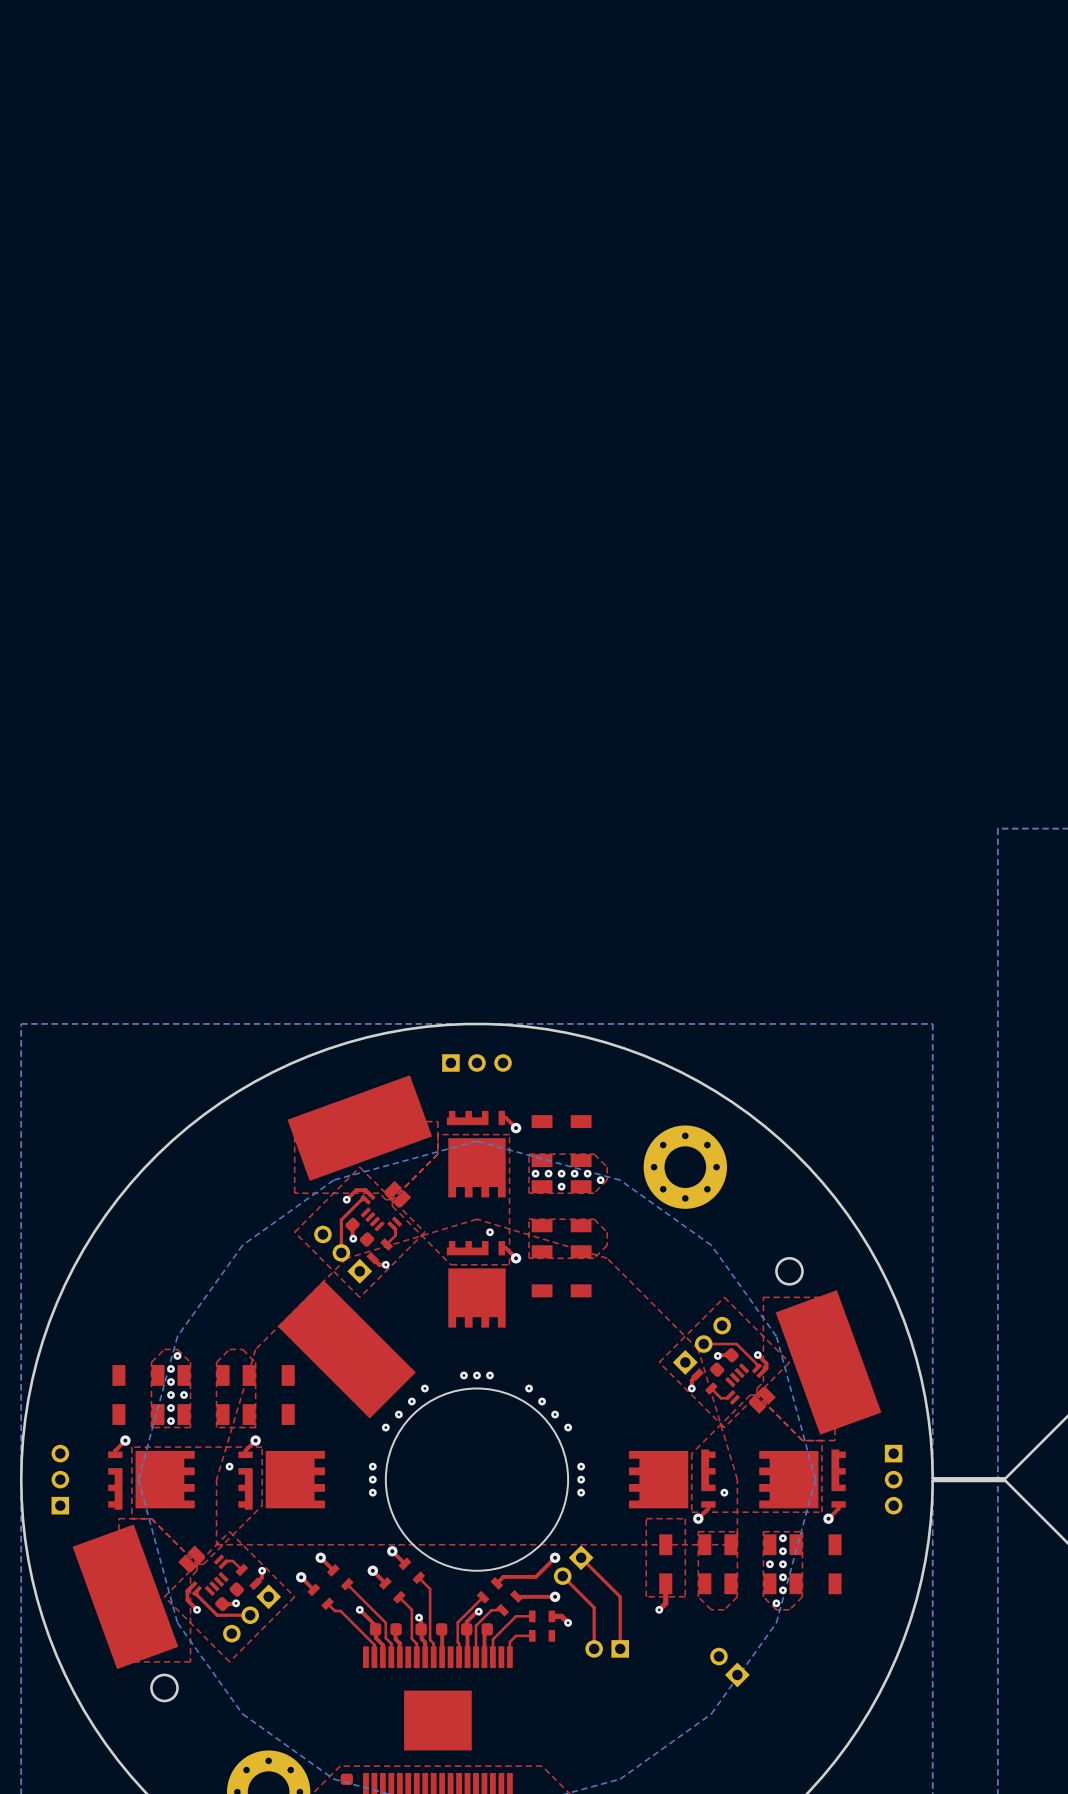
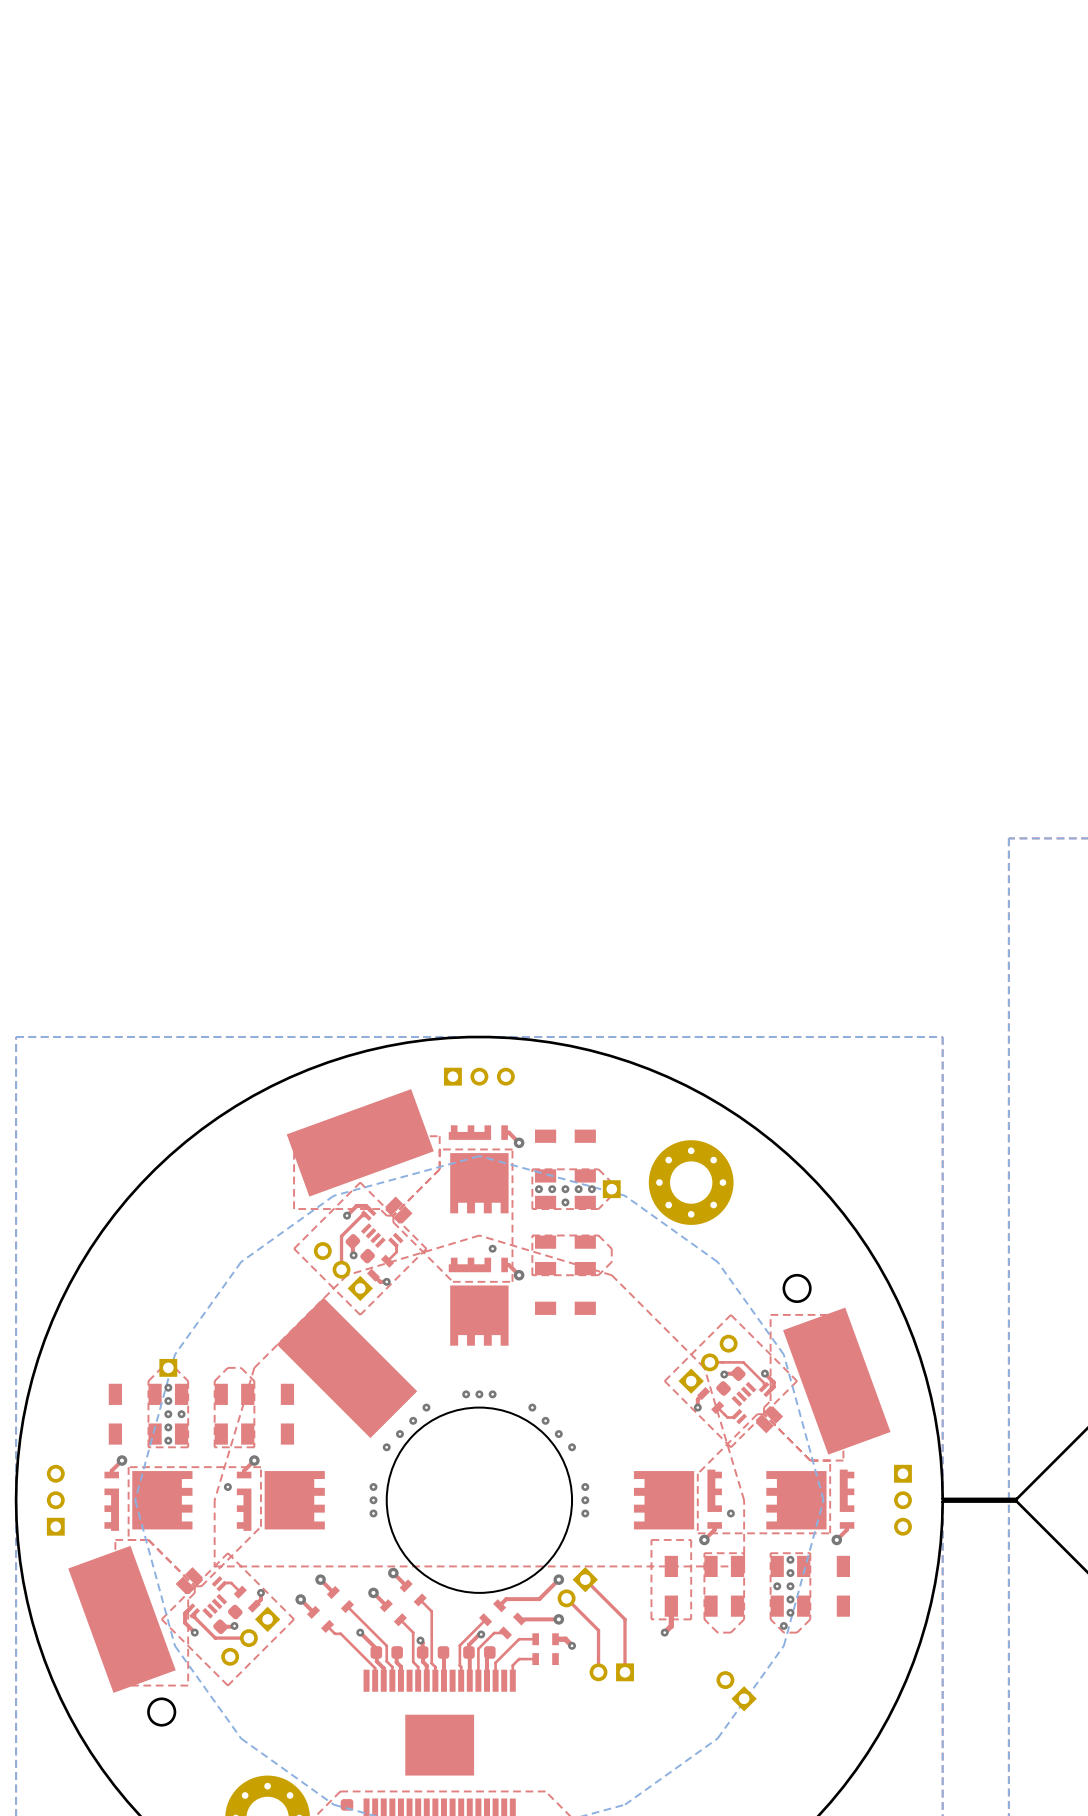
part: none -> (611, 1189)
via: (600, 1180) -> none
part: none -> (168, 1367)
via: (177, 1355) -> none

